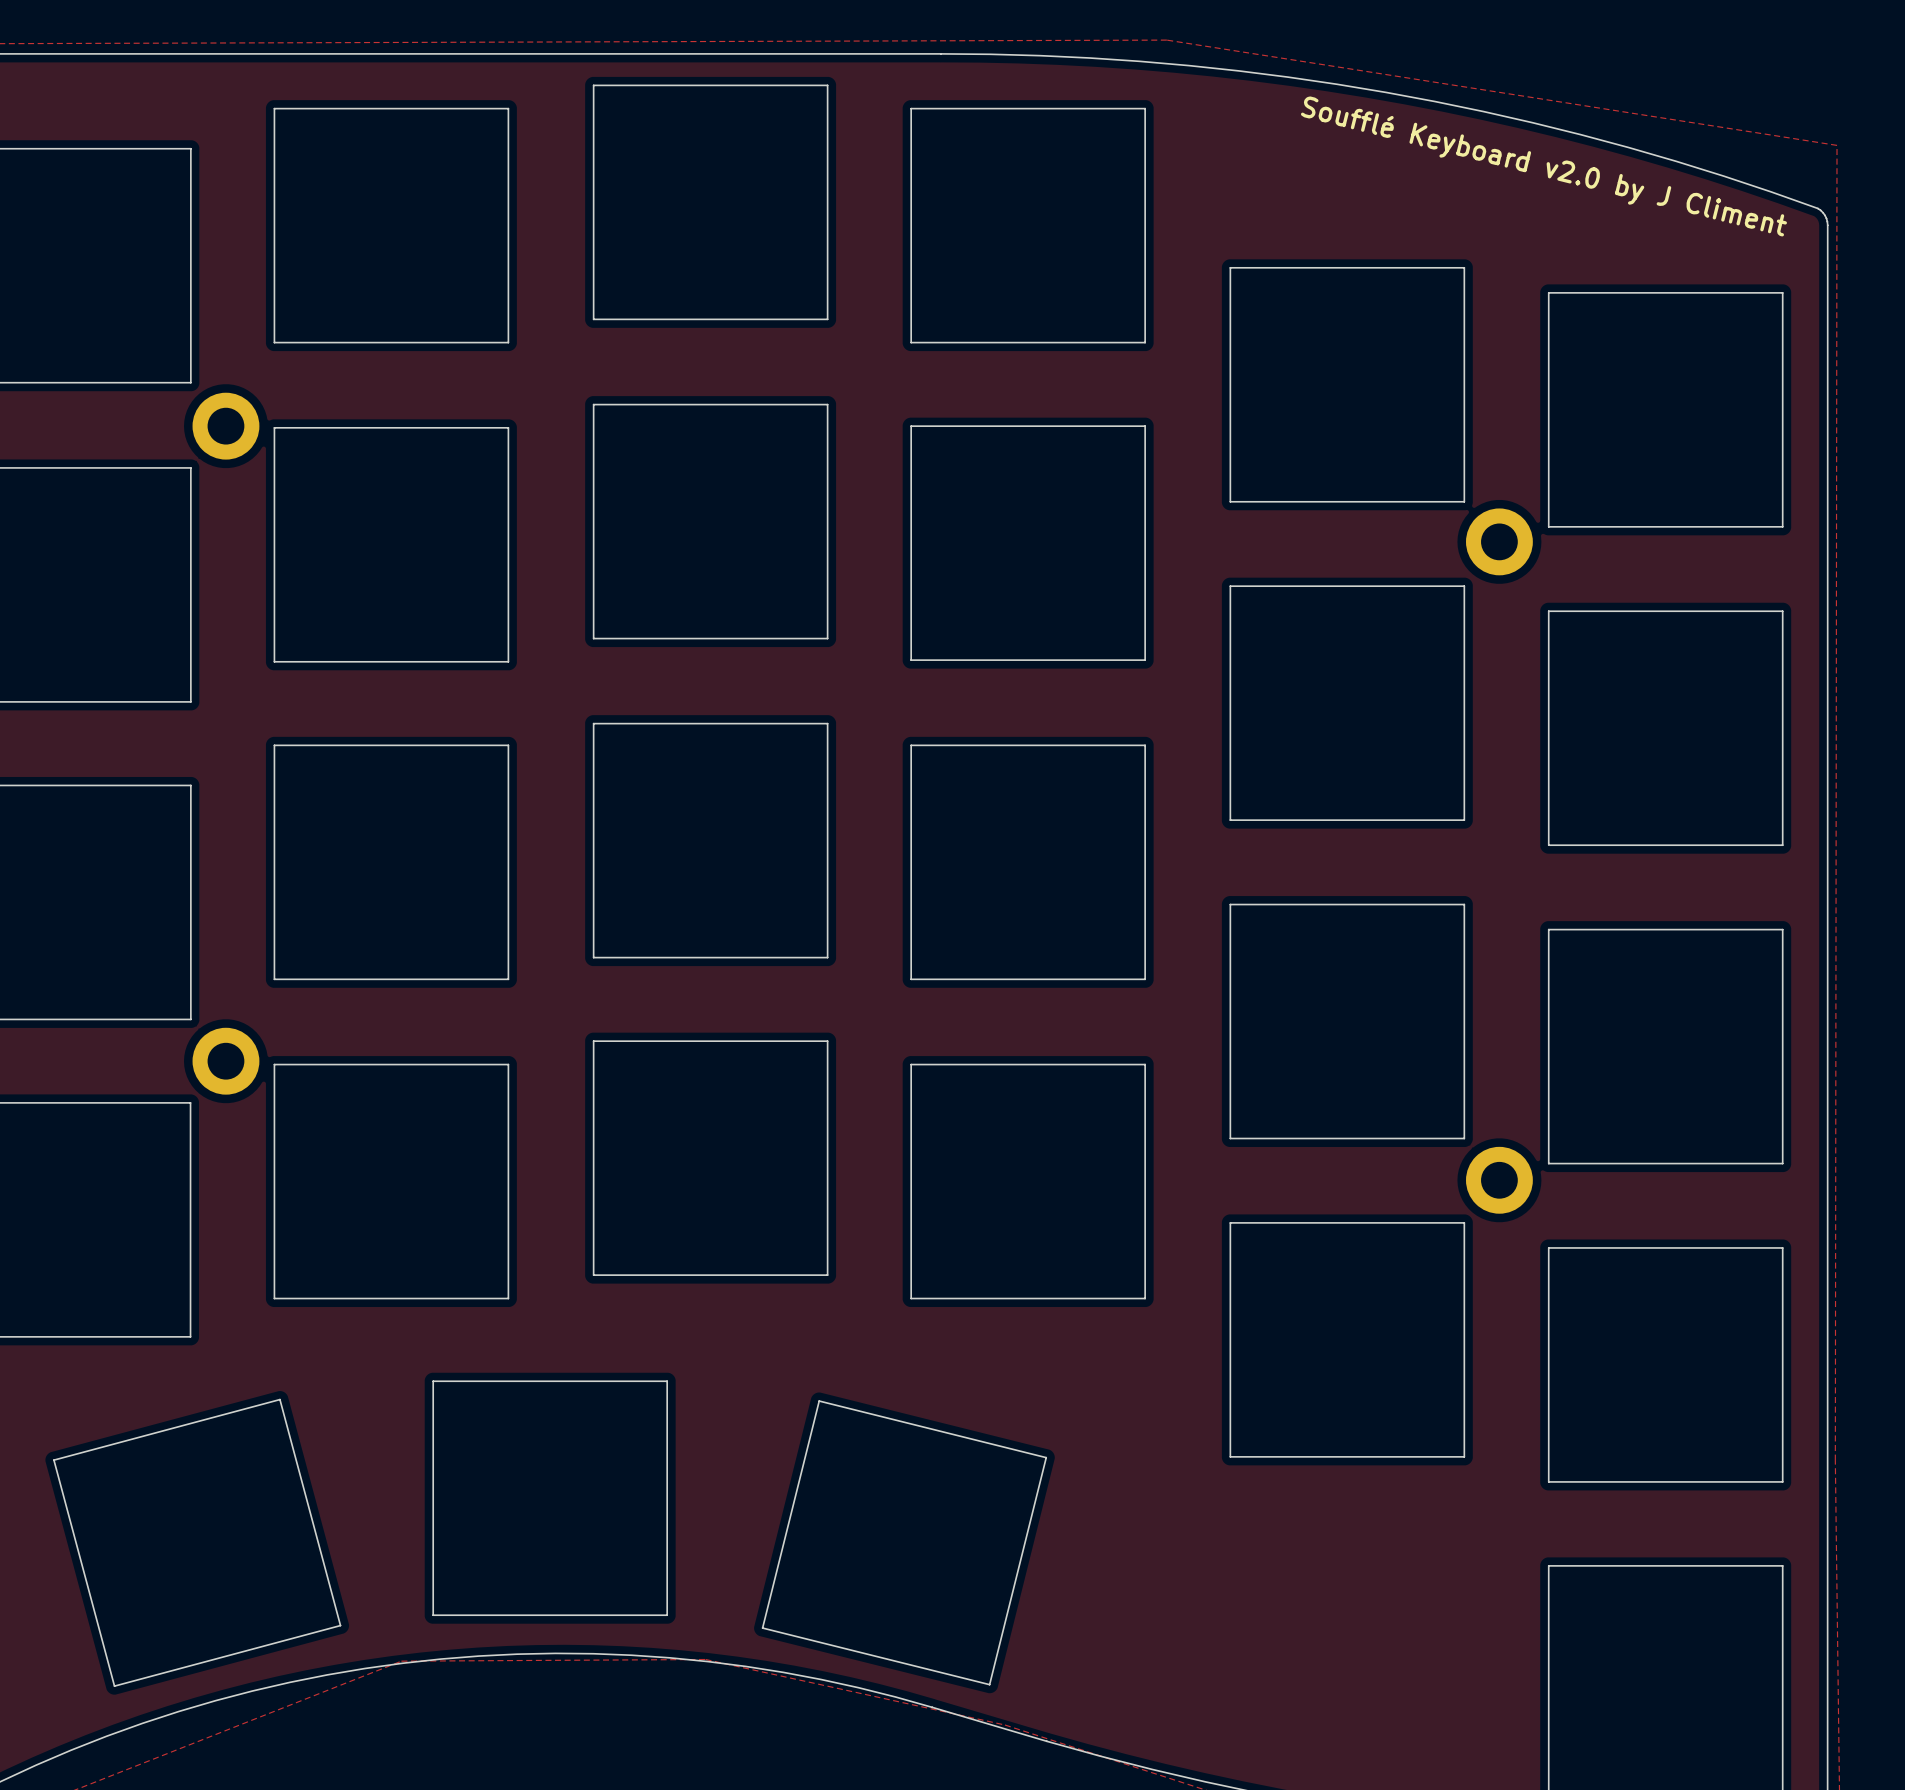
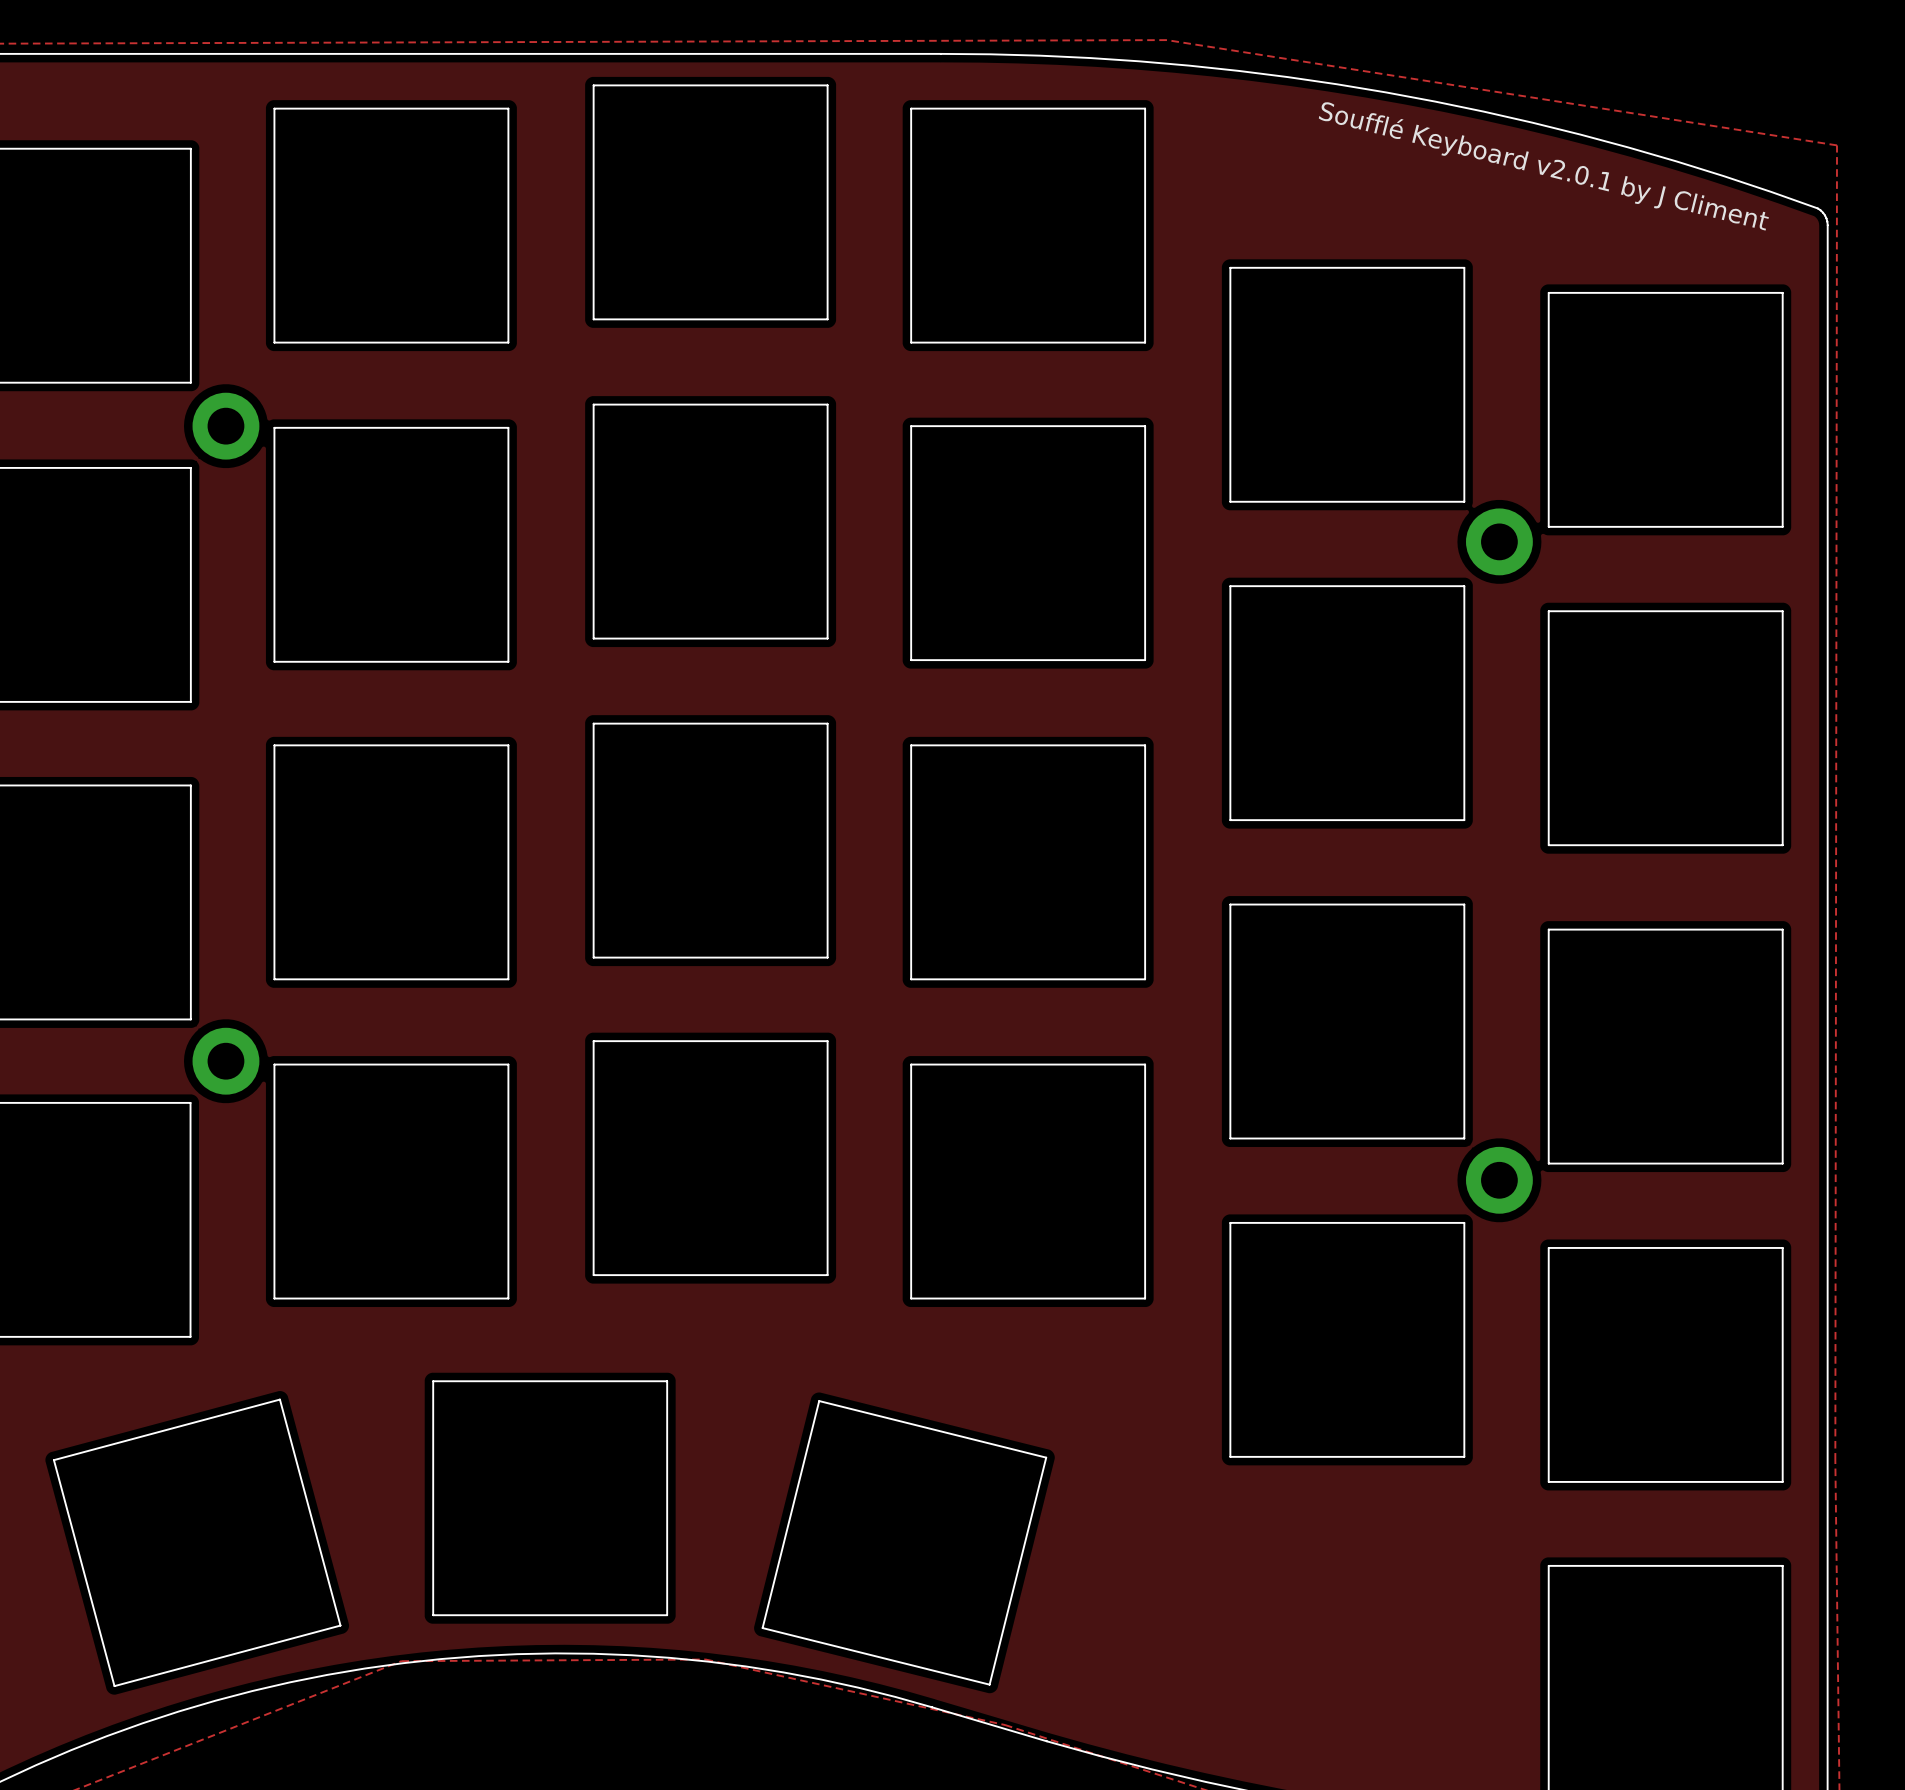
text: Soufflé Keyboard v2.0 by J Climent (1543, 166) -> Soufflé Keyboard v2.0.1 by J Climent (1543, 166)

